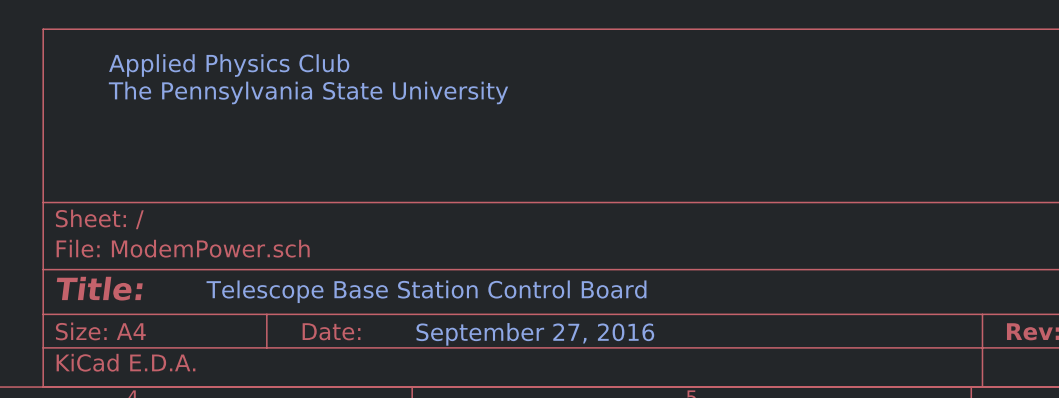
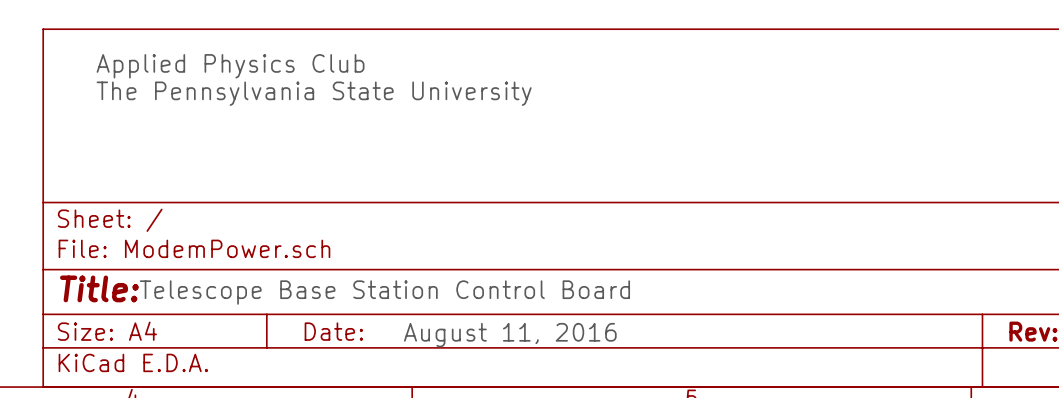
text position: Applied Physics Club (229, 65) -> Applied Physics Club (230, 66)
text position: The Pennsylvania State University (308, 92) -> The Pennsylvania State University (314, 93)
text position: Telescope Base Station Control Board (426, 291) -> Telescope Base Station Control Board (384, 292)
text: none -> August 11, 2016 (510, 335)
text: September 27, 2016 (535, 334) -> none

